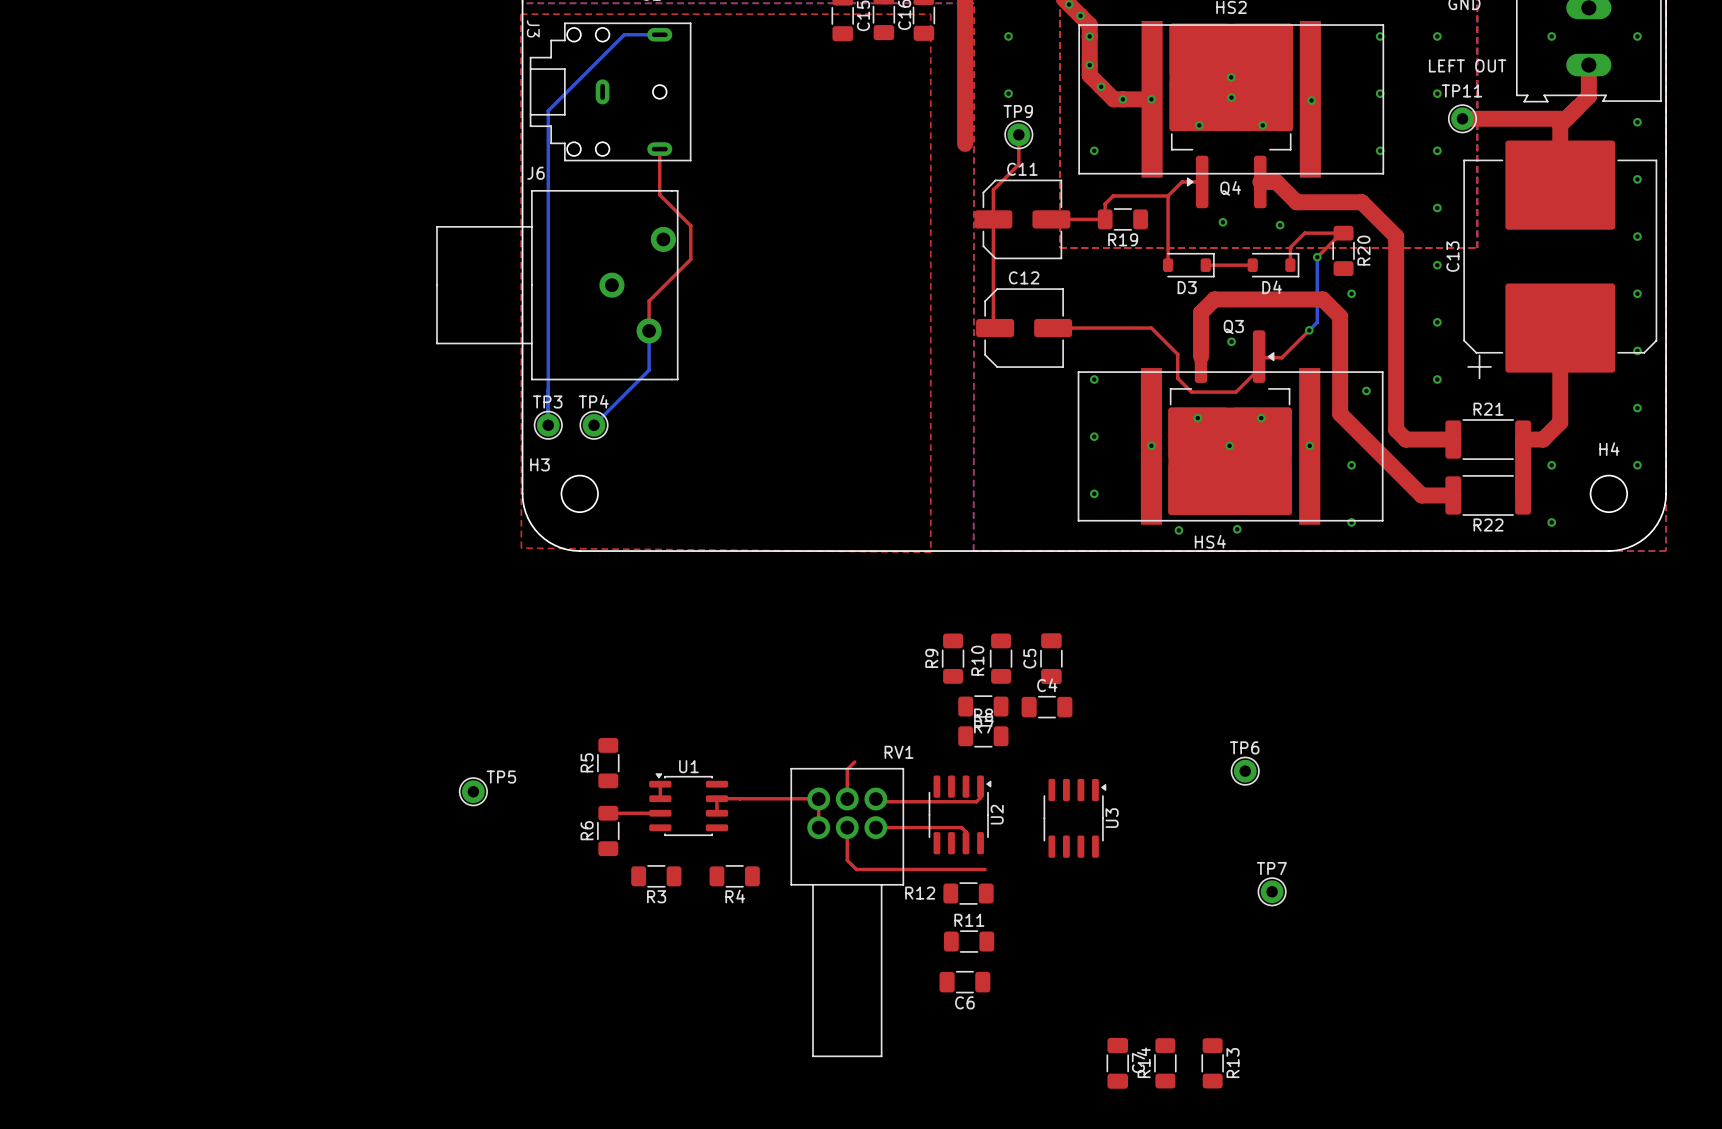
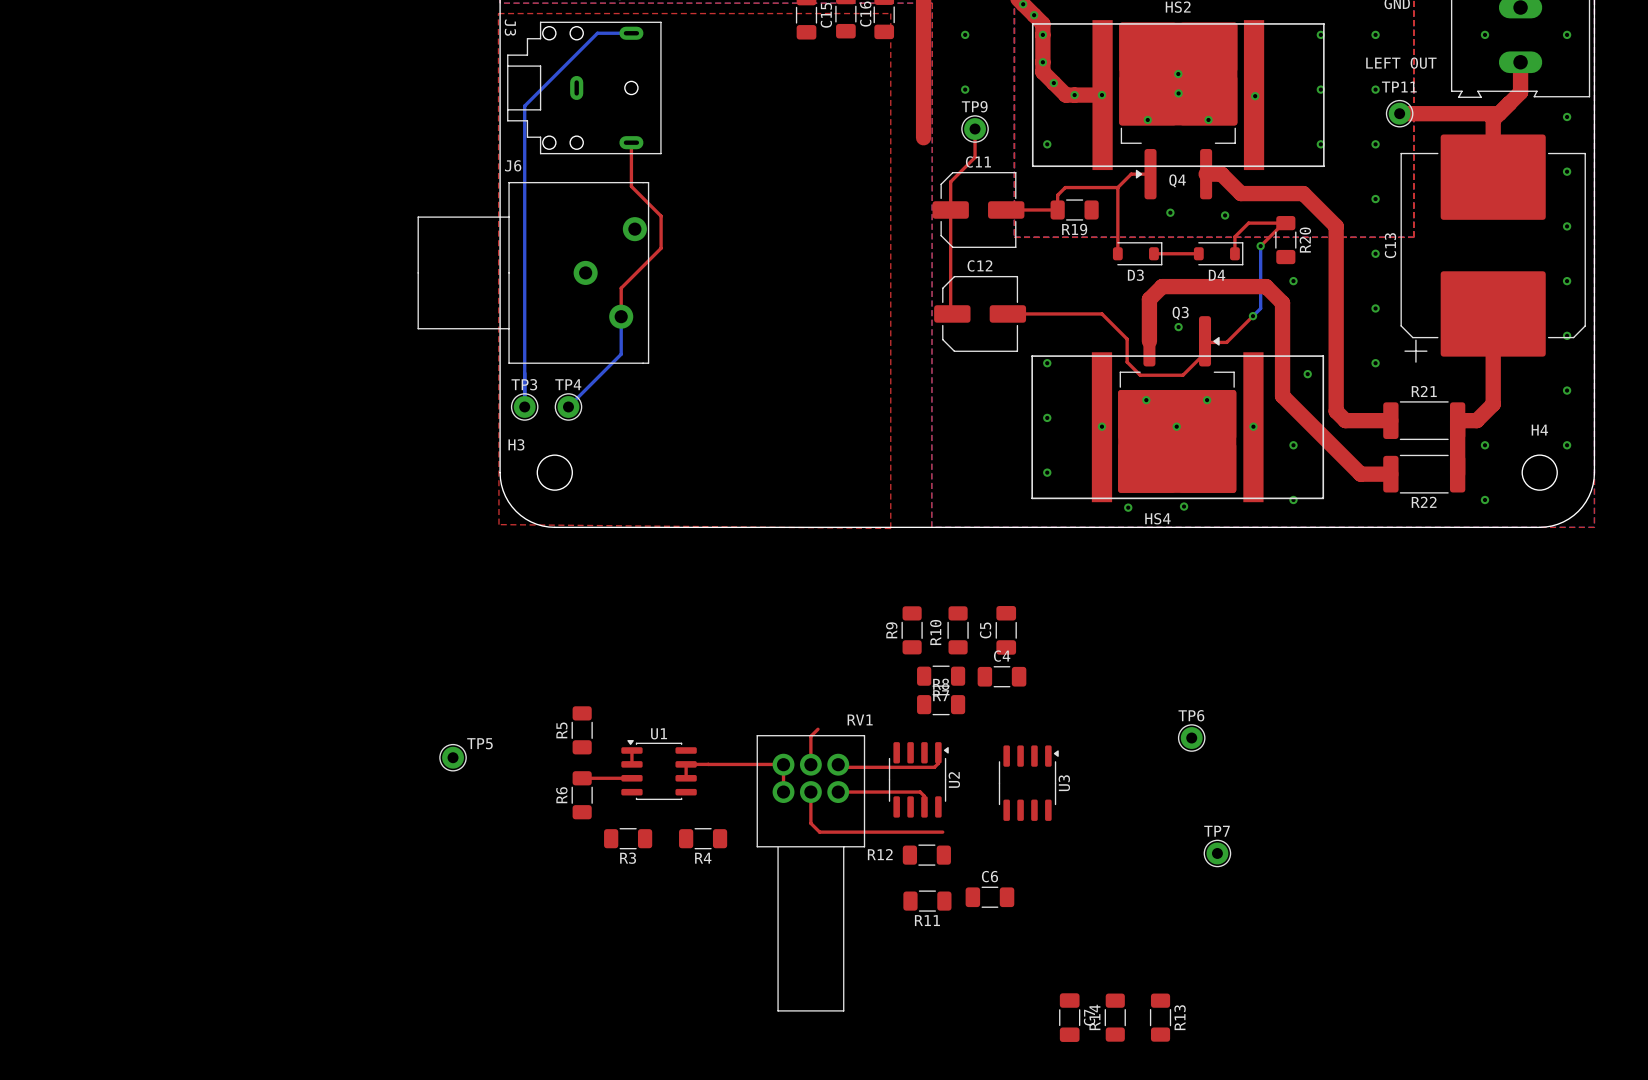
R11 name position: R11 (969, 920) -> R11 (927, 920)
C6 position: (964, 982) -> (989, 897)
C6 name position: C6 (964, 1002) -> C6 (989, 876)

